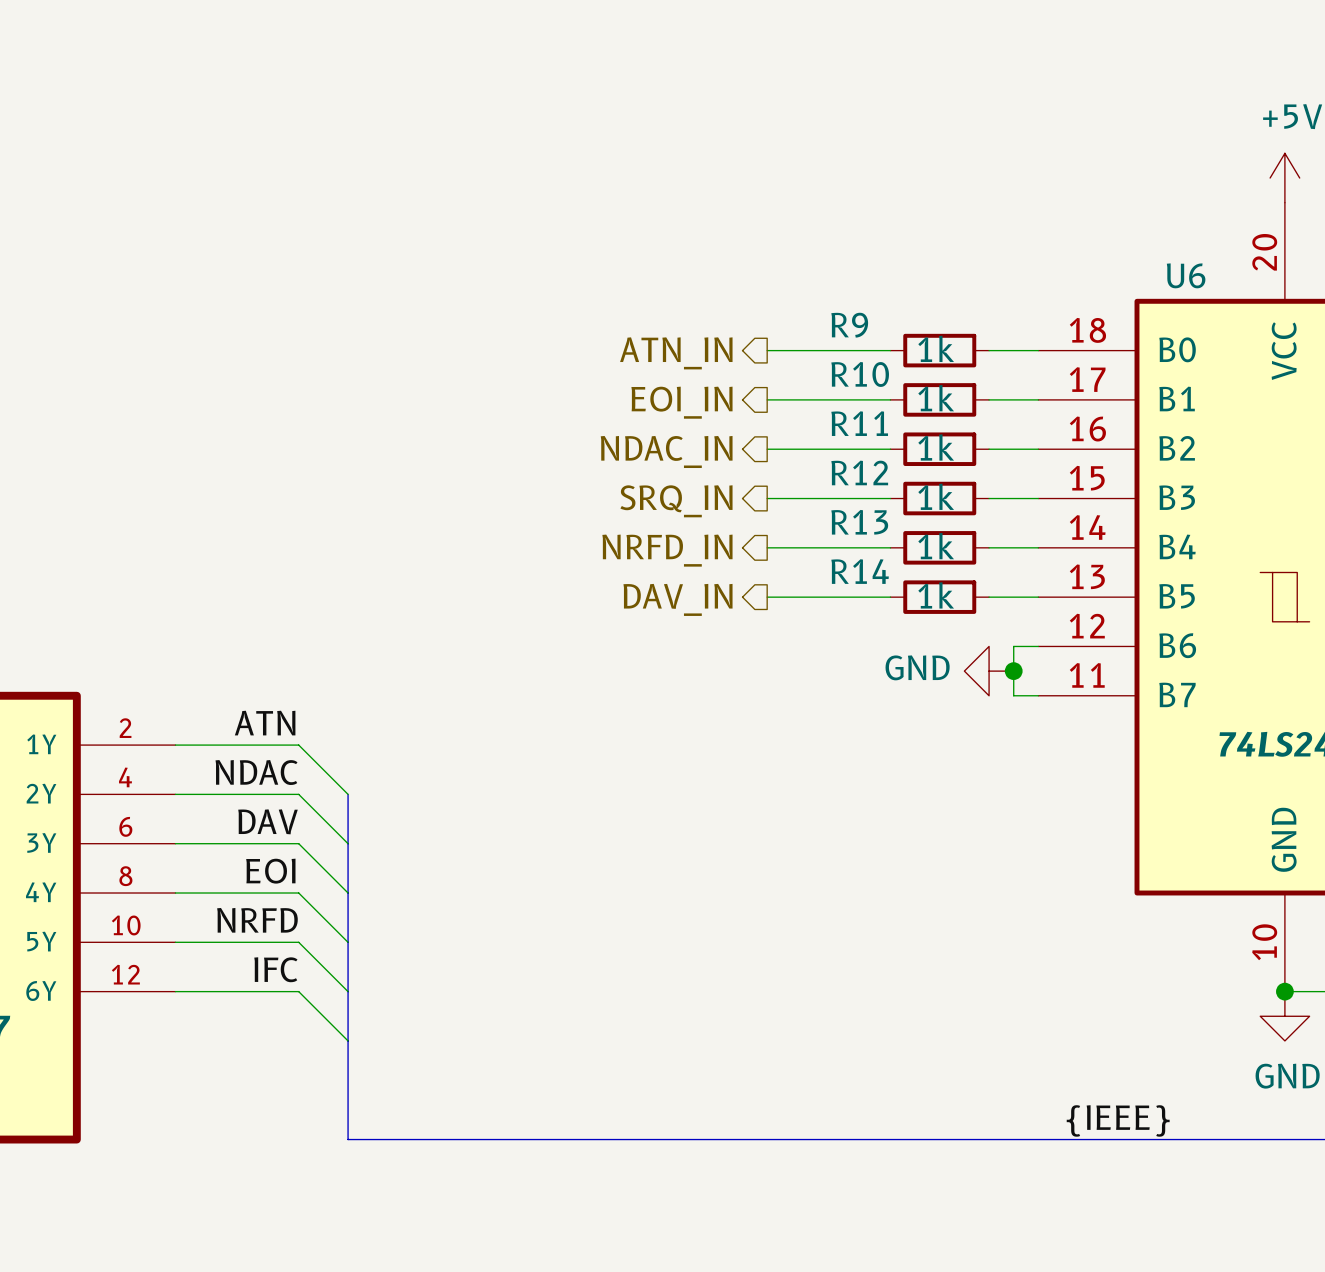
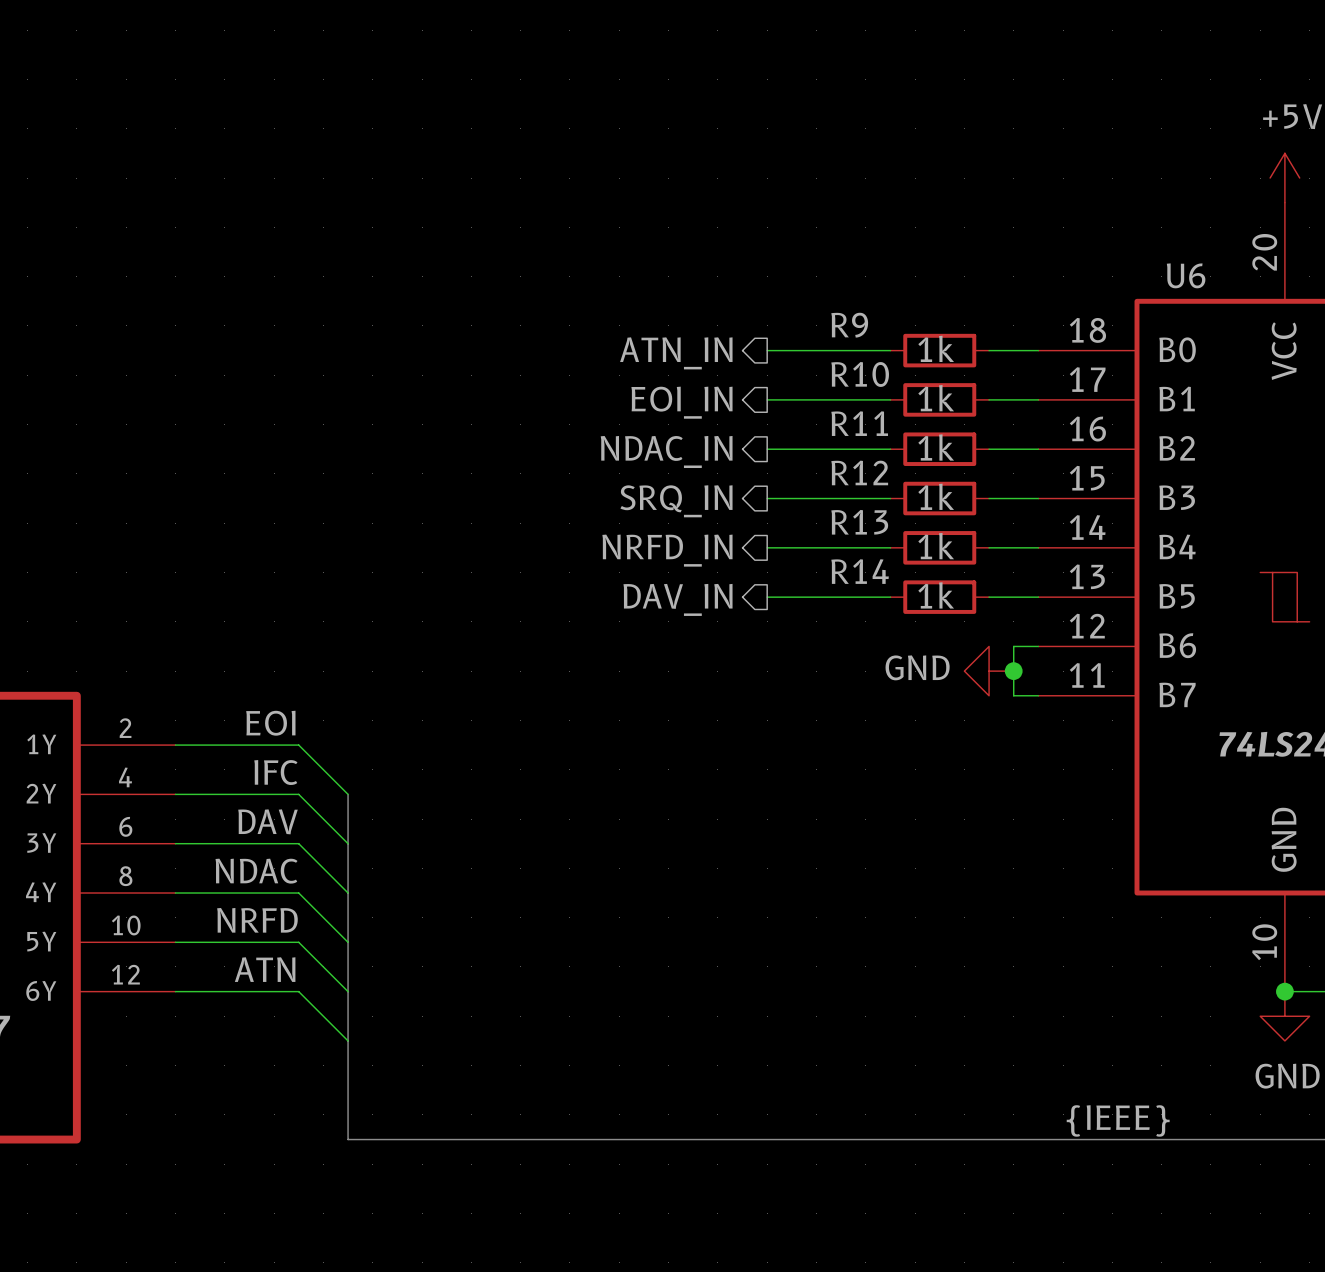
label: ATN (265, 723) -> EOI (270, 723)
label: NDAC (256, 772) -> IFC (275, 772)
label: EOI (270, 871) -> NDAC (256, 871)
label: IFC (275, 969) -> ATN (265, 969)

